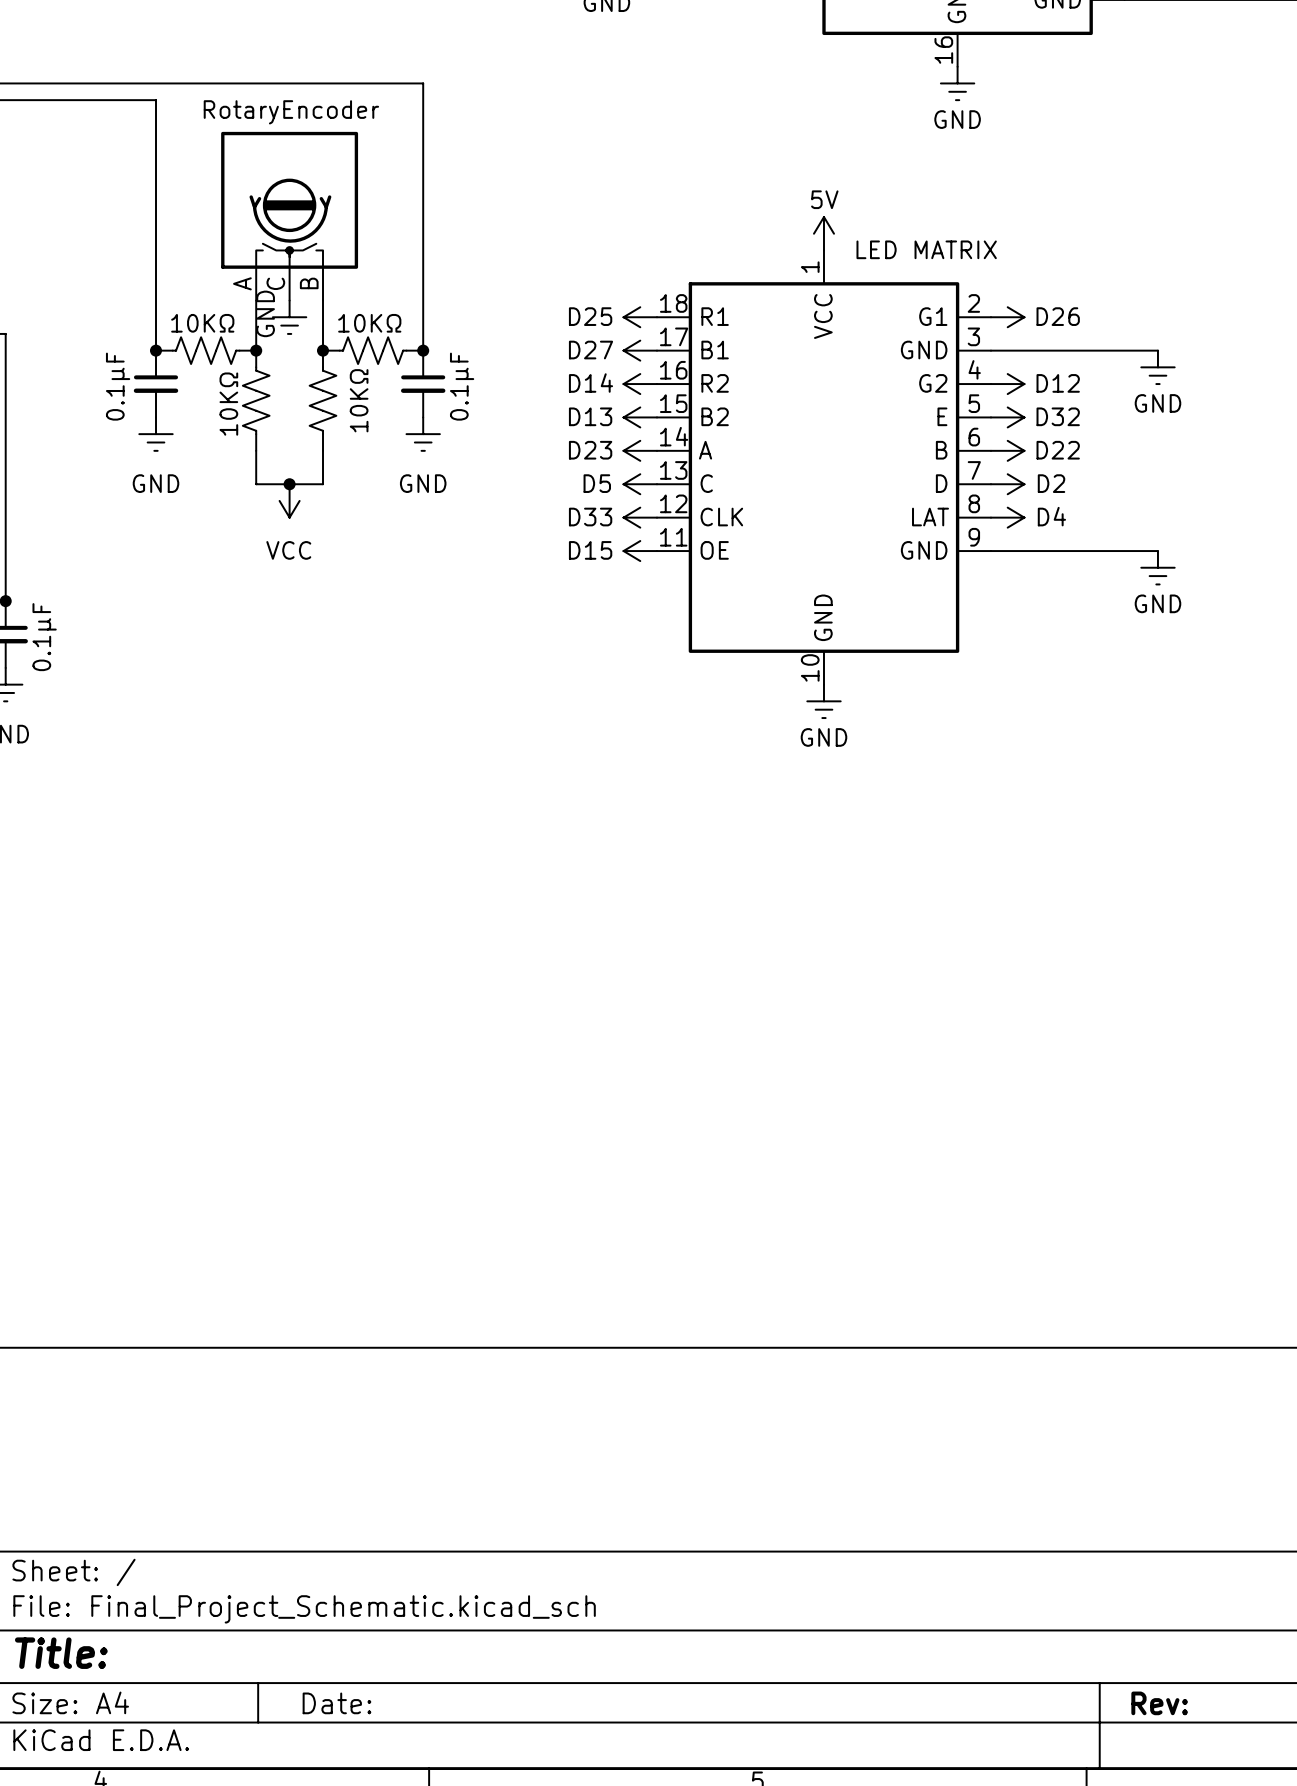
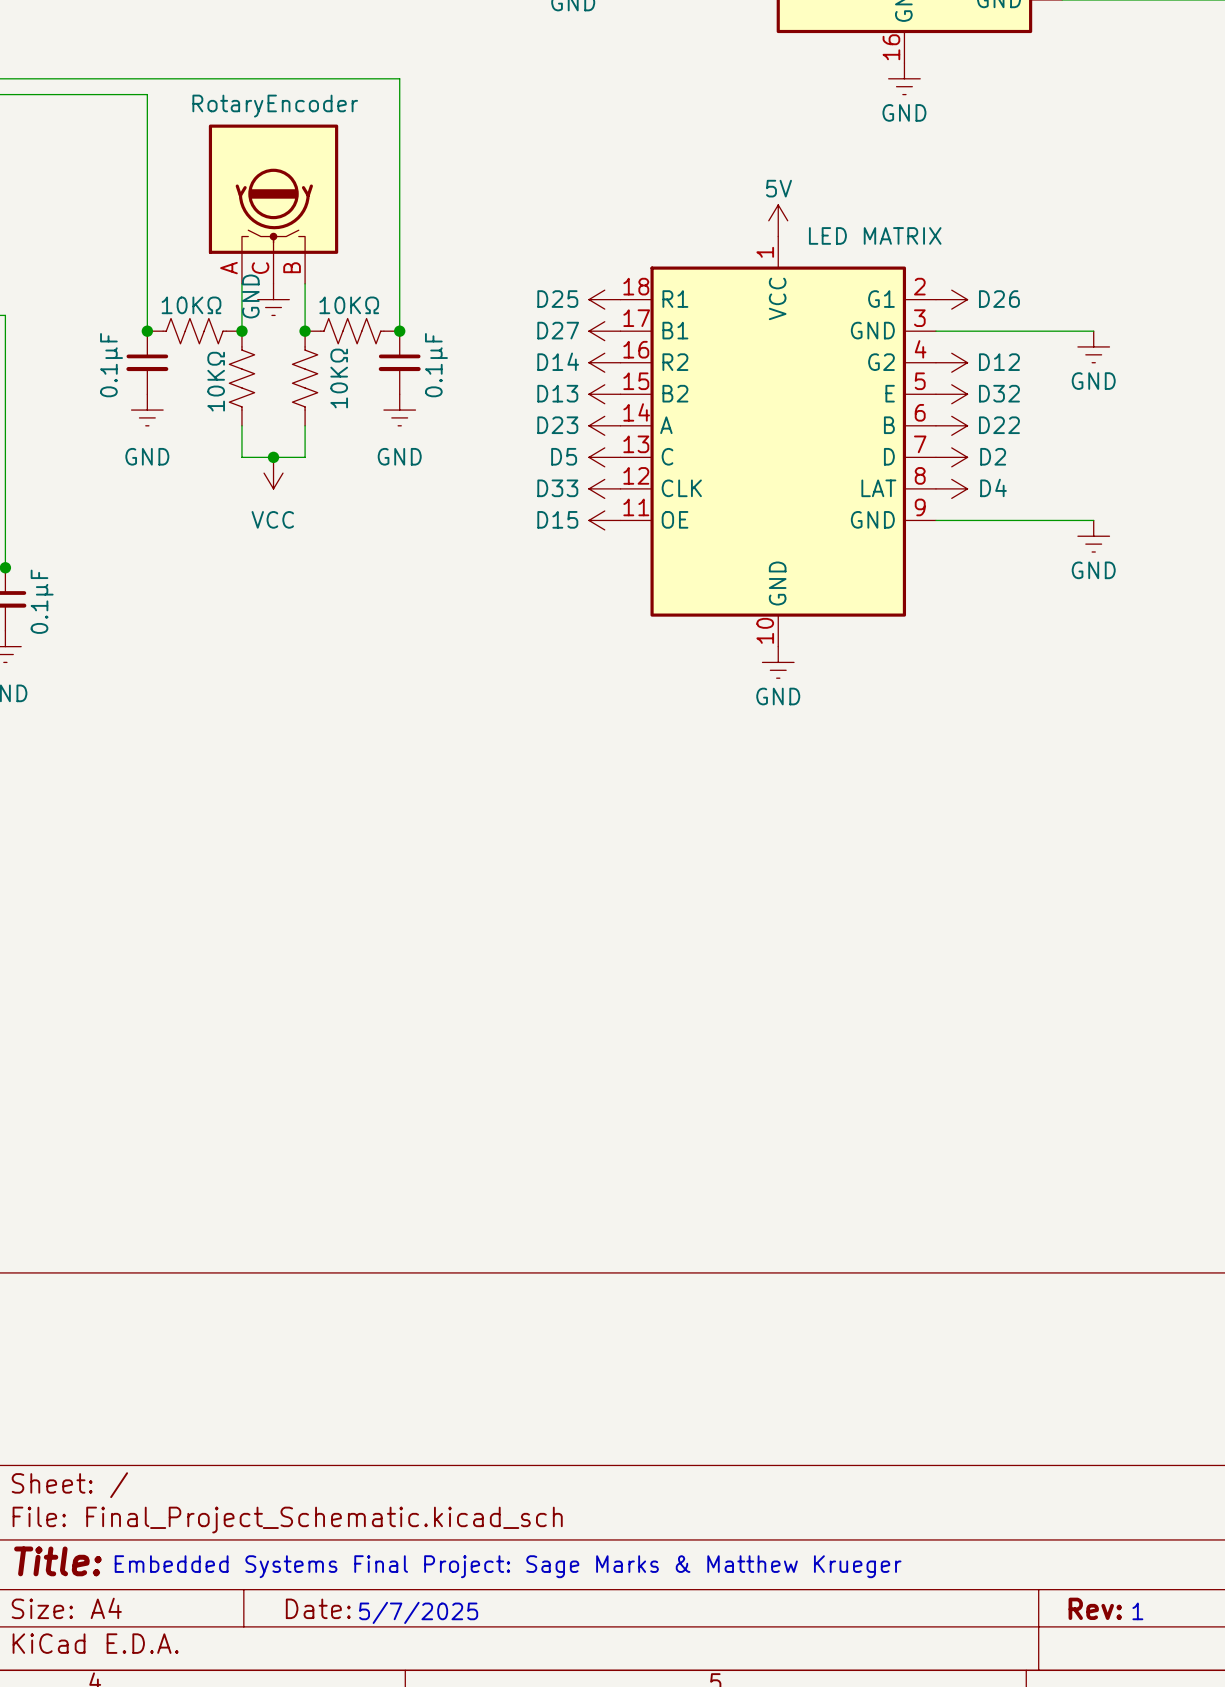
text: none -> Embedded Systems Final Project: Sage Marks & Matthew Krueger (508, 1566)
text: none -> 1 (1137, 1611)
text: none -> 5/7/2025 (418, 1612)

